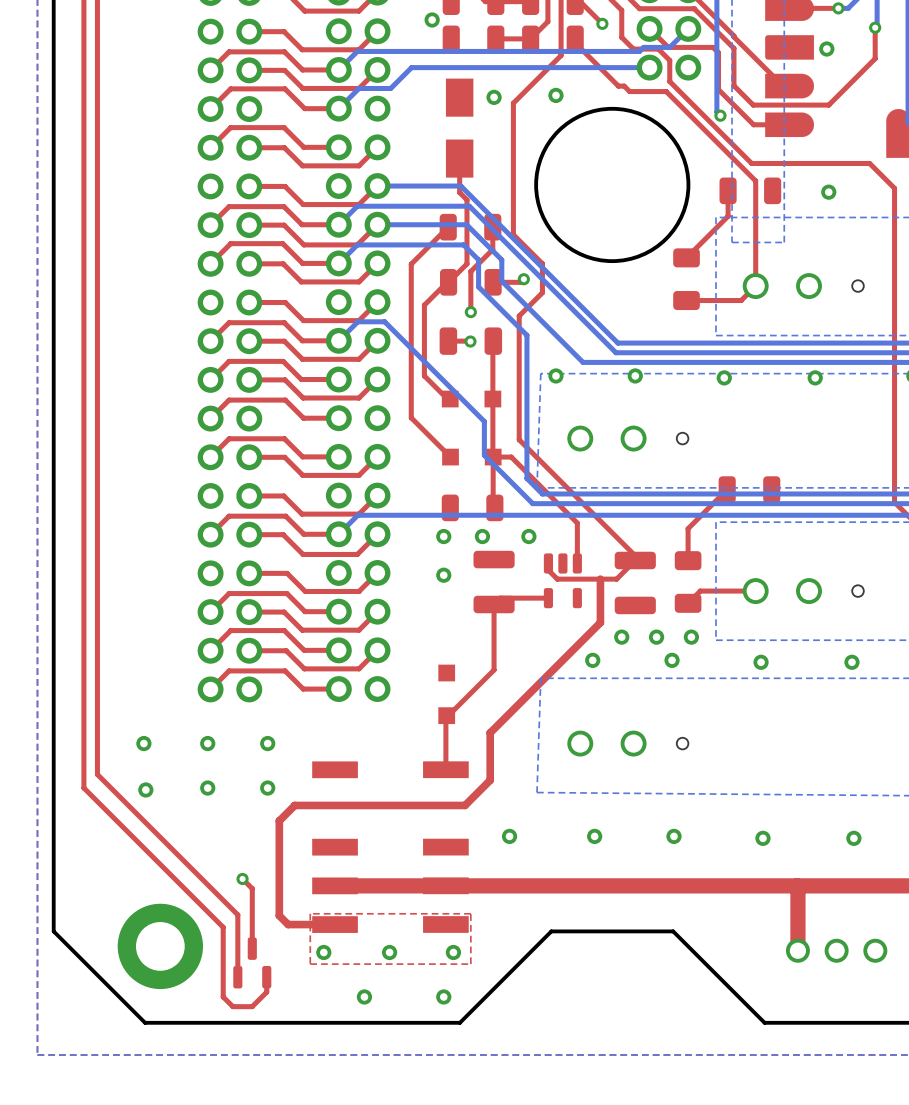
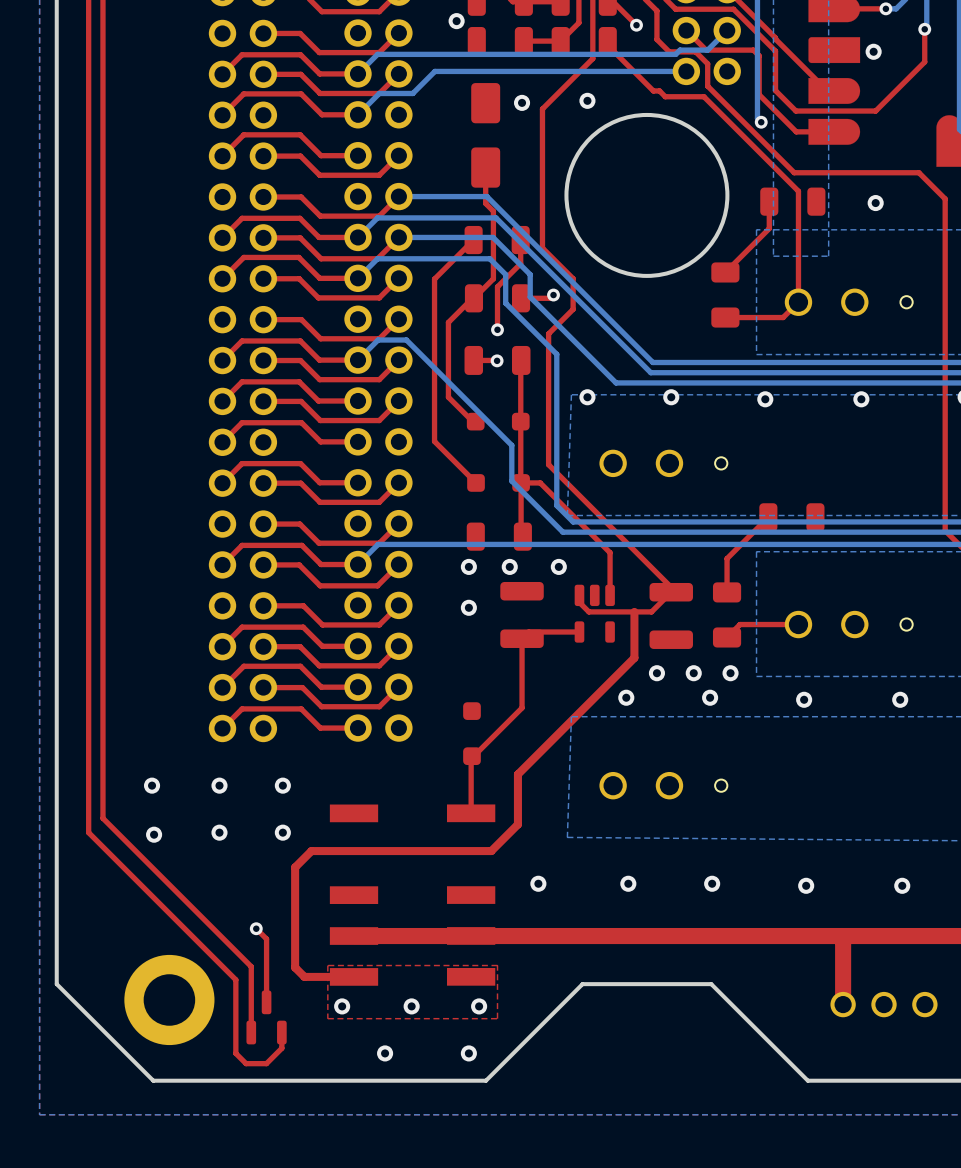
part footprint: [445, 78, 474, 178] -> [471, 83, 501, 188]
part footprint: [441, 390, 502, 408] -> [466, 412, 530, 431]
part footprint: [442, 448, 502, 466] -> [467, 474, 530, 492]
part footprint: [438, 664, 456, 725] -> [463, 702, 481, 766]

